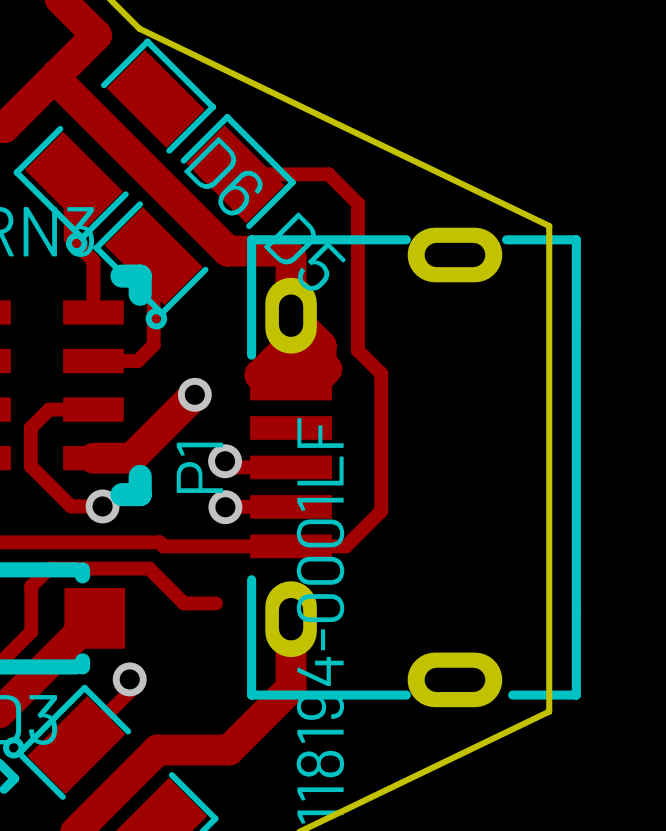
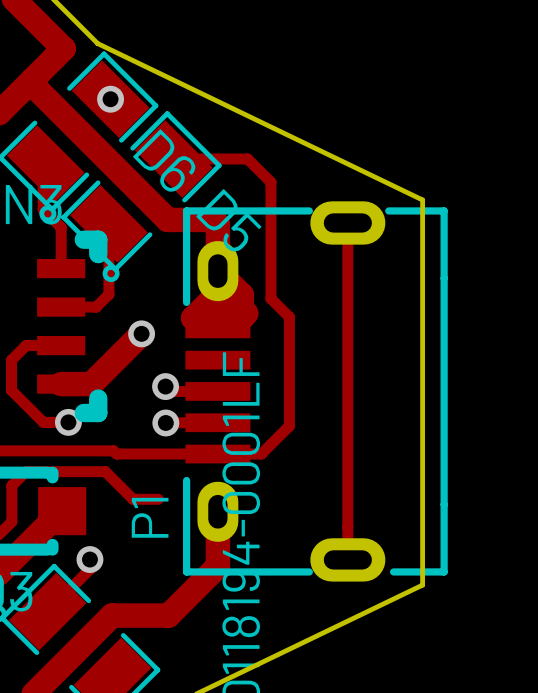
via: none -> (110, 99)
track: none -> (347, 222) (347, 559)
P1 name position: P1 (199, 467) -> P1 (150, 517)

